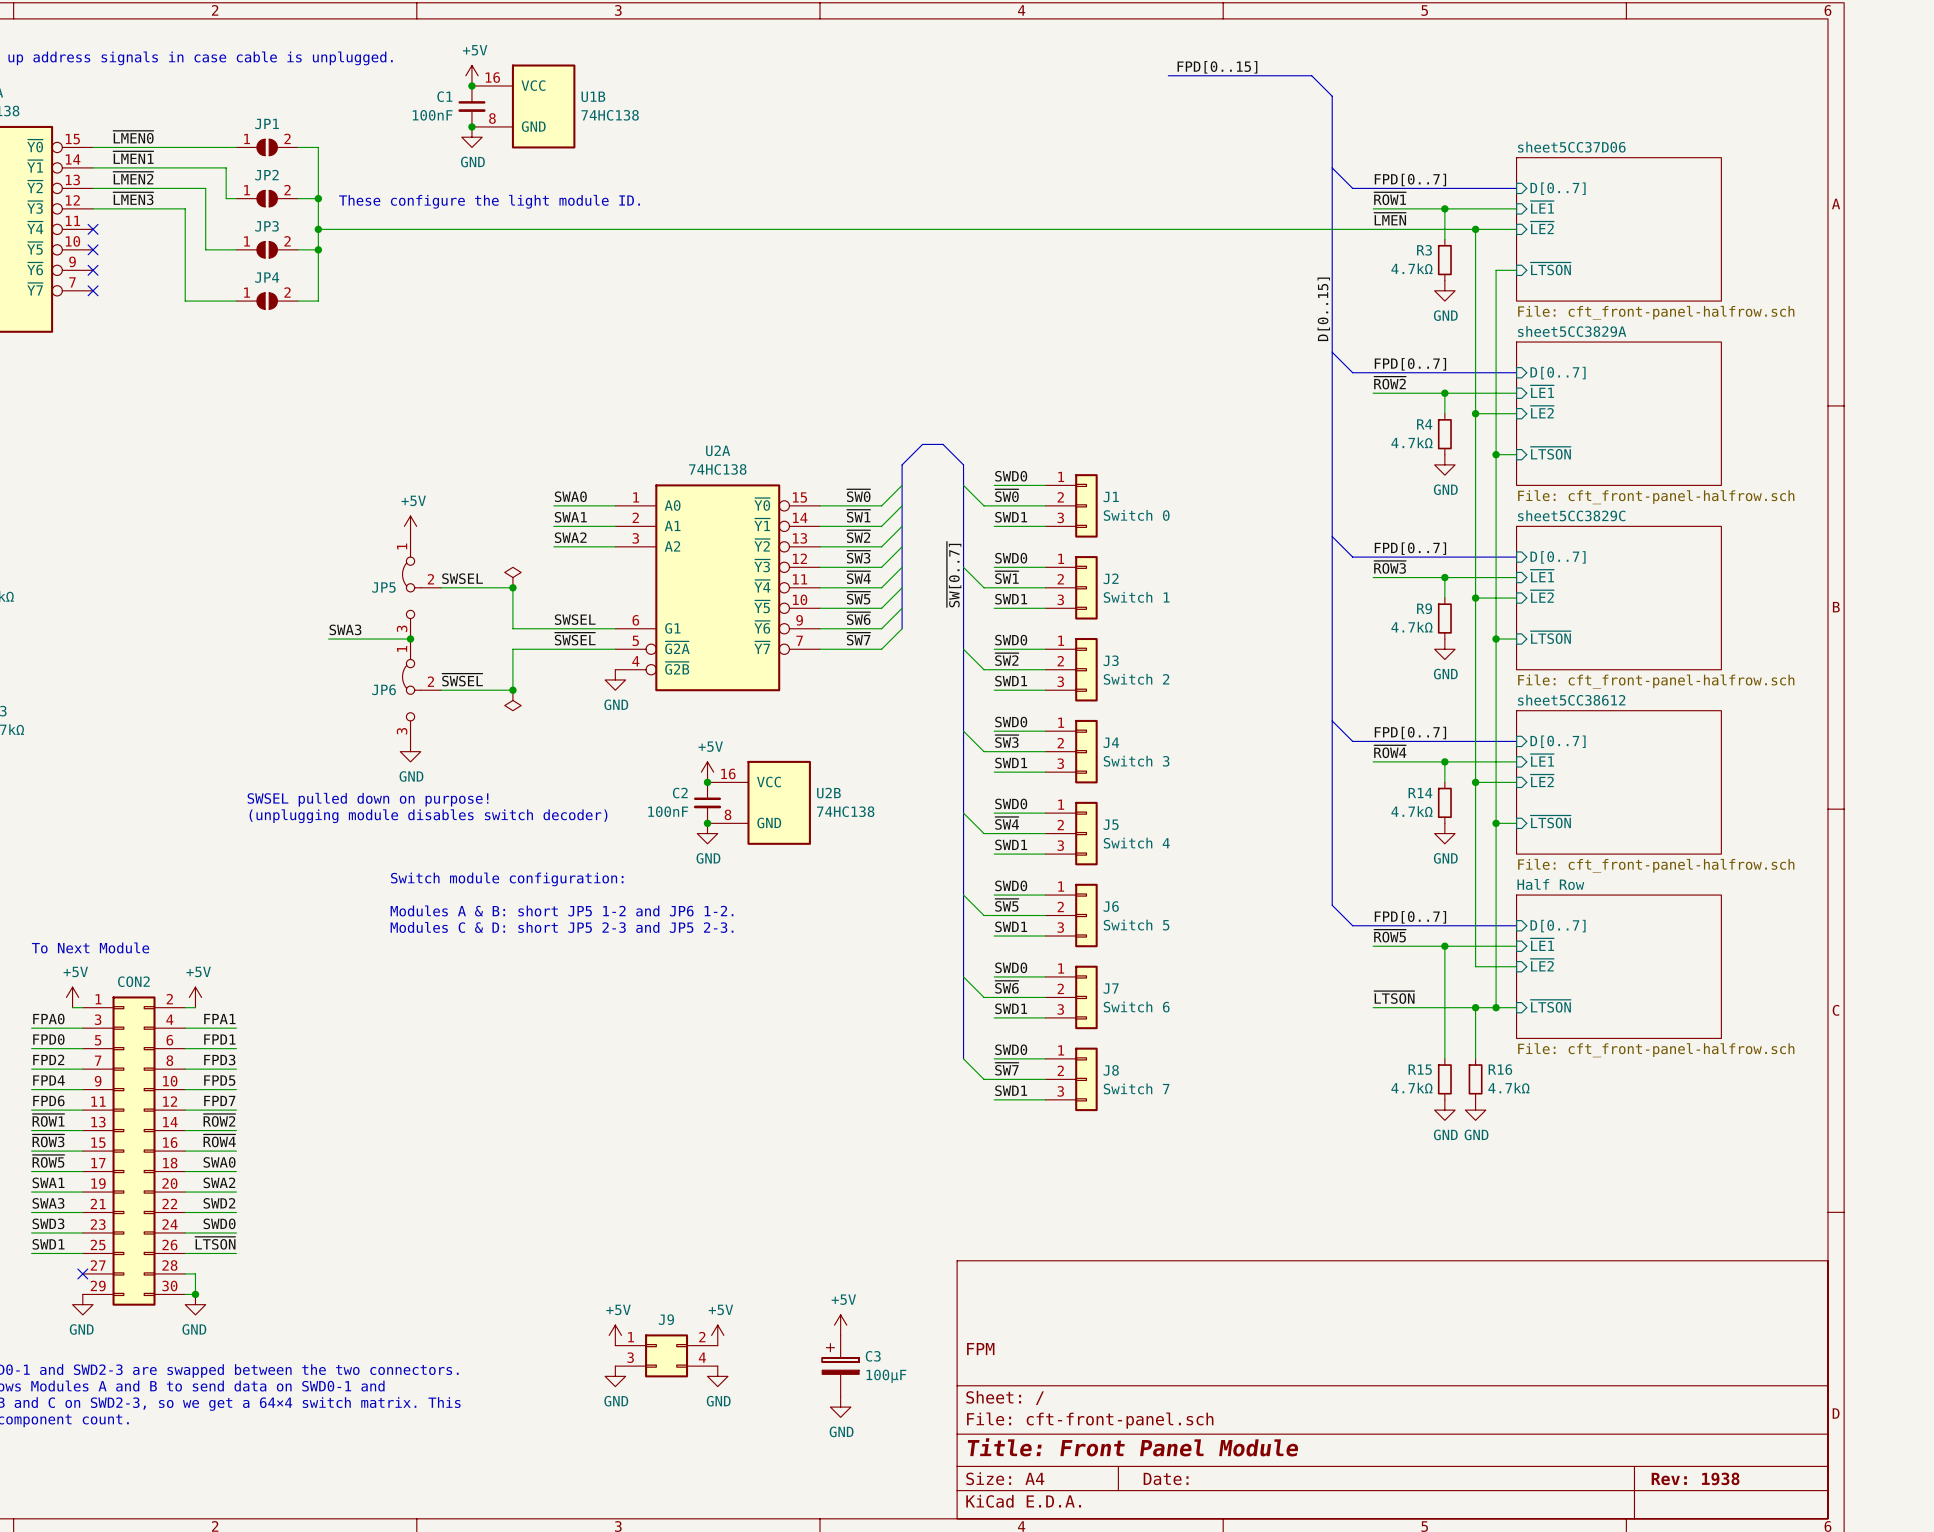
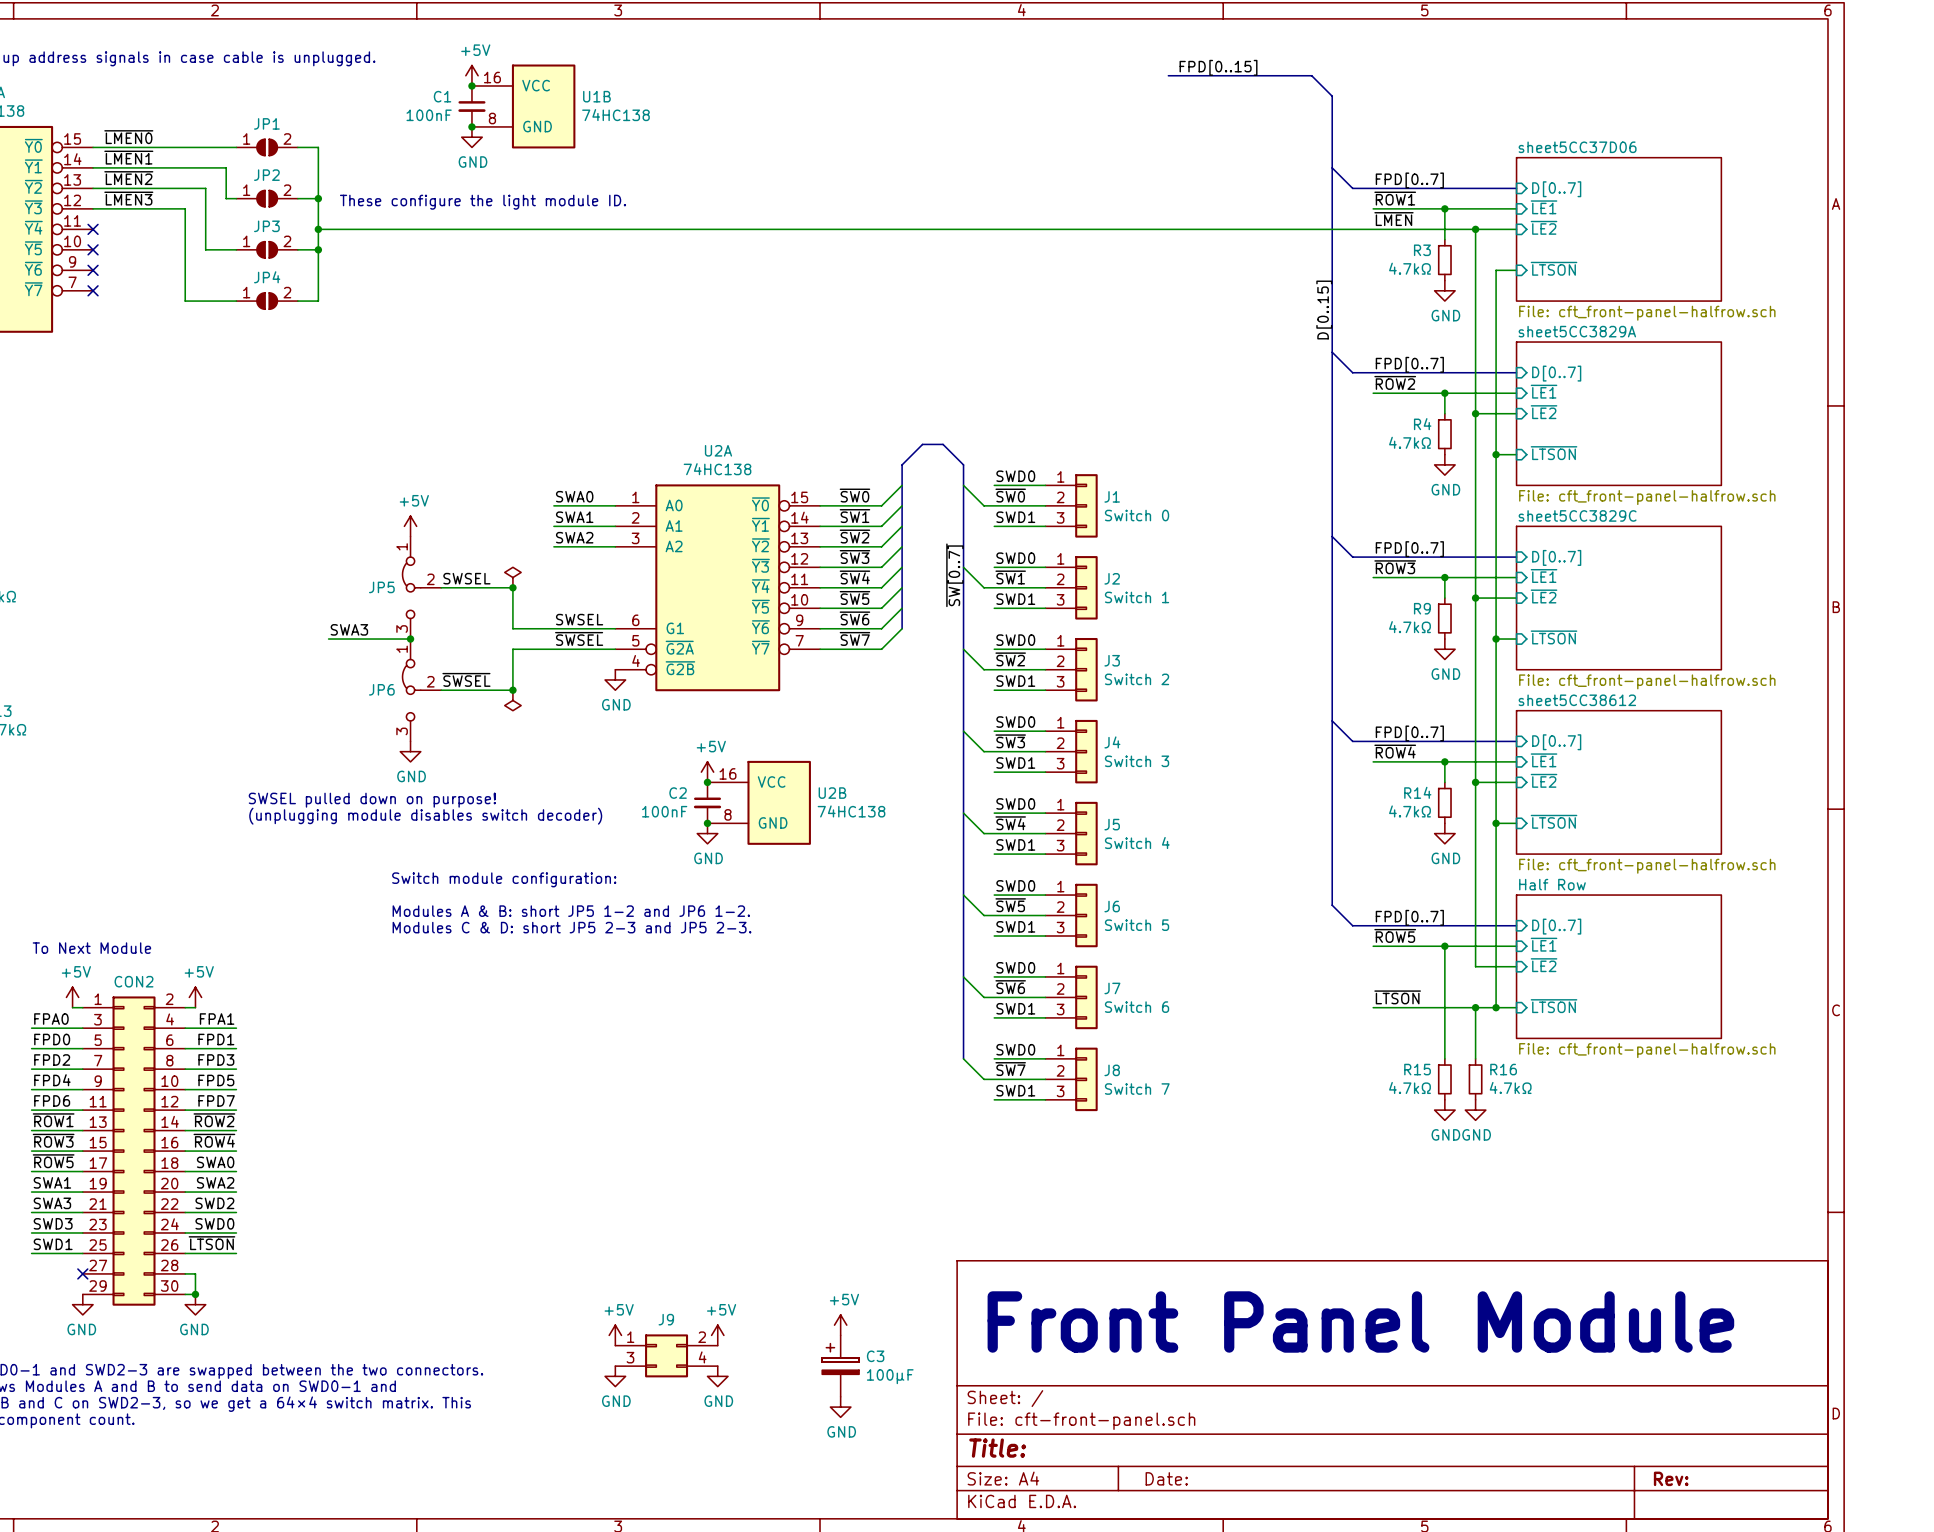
text: none -> Front Panel Module (1360, 1321)
title block: FPM (980, 1349) -> none
title block: Title: Front Panel Module (1133, 1447) -> Title: (997, 1448)
title block: Rev: 1938 (1695, 1478) -> Rev: (1671, 1478)

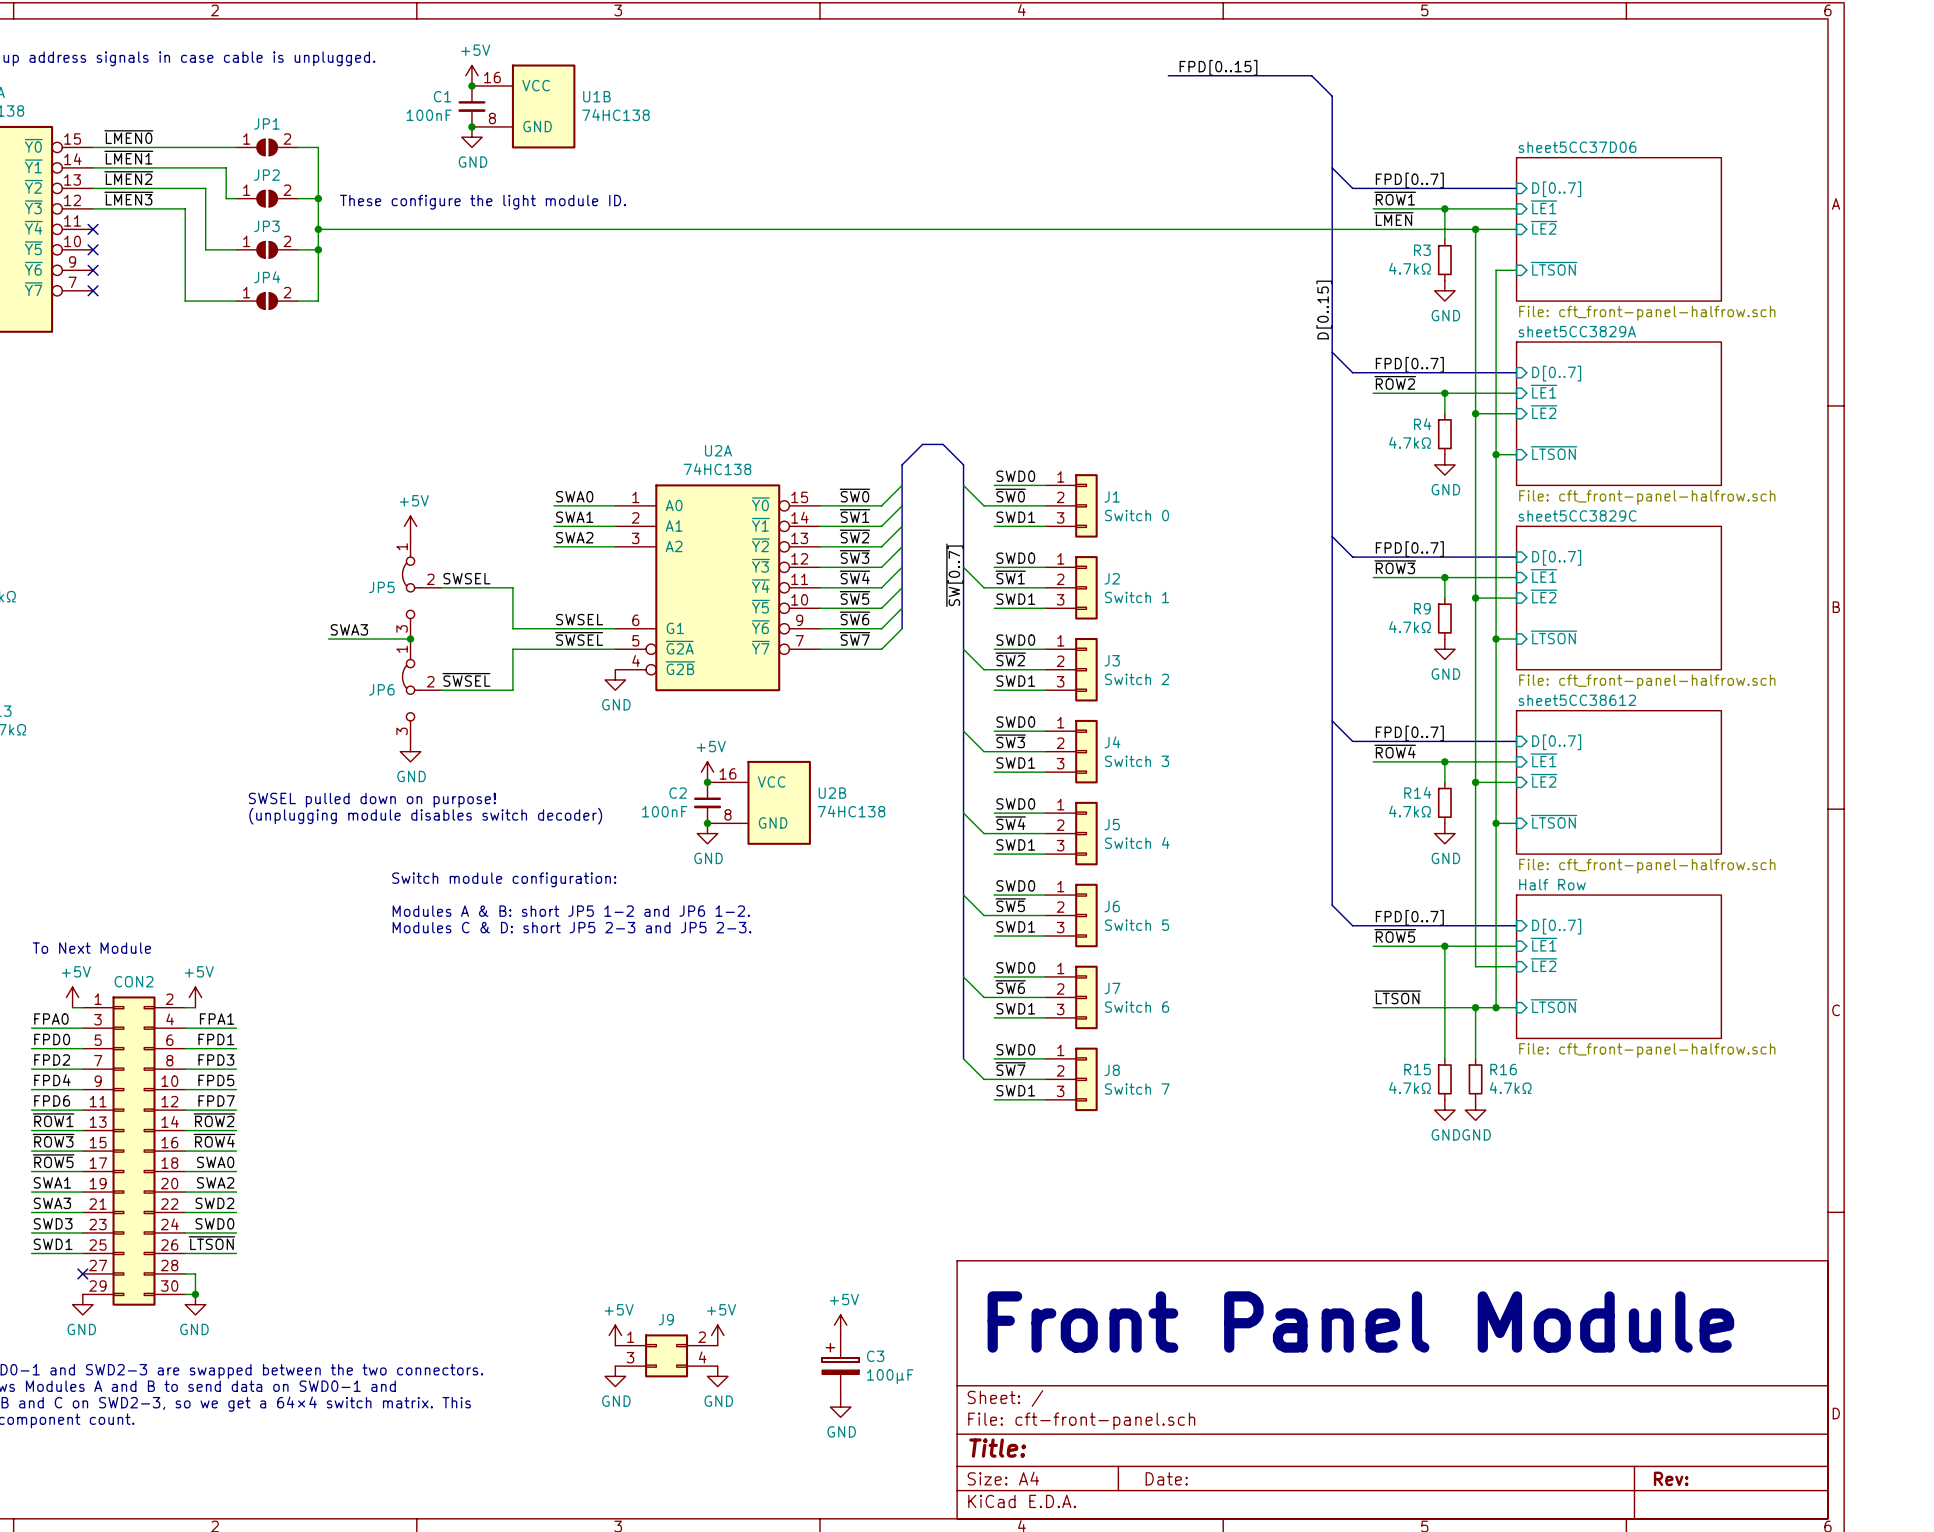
power symbol: (512, 577) -> none
junction: (512, 587) -> none
junction: (512, 690) -> none
power symbol: (512, 700) -> none

